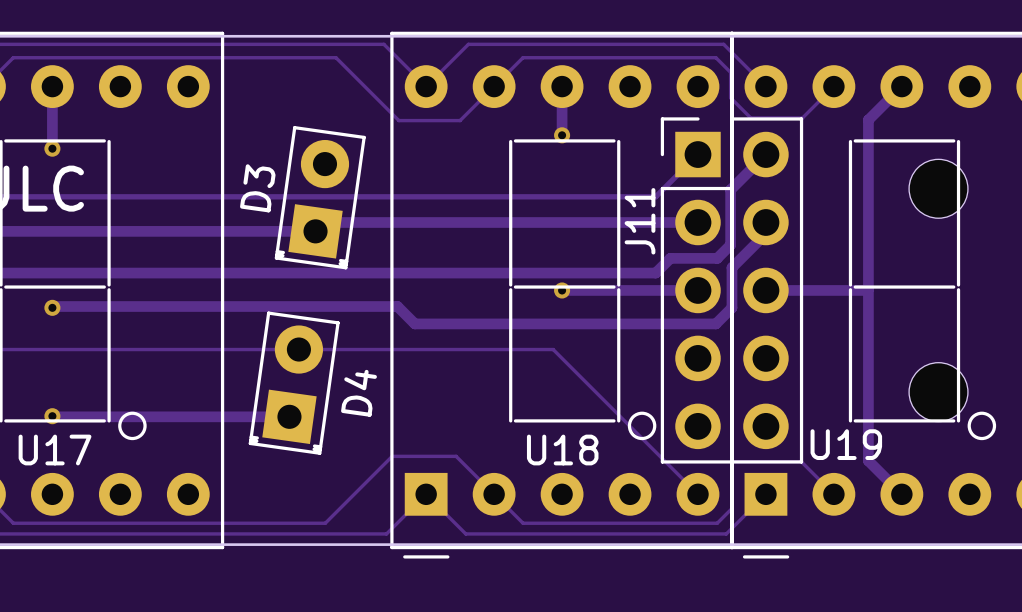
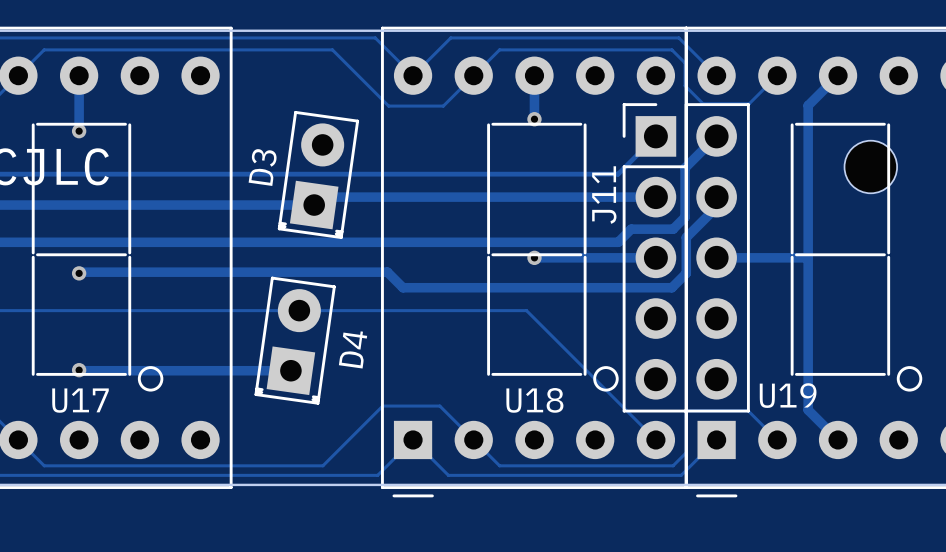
part: (938, 392) -> none

